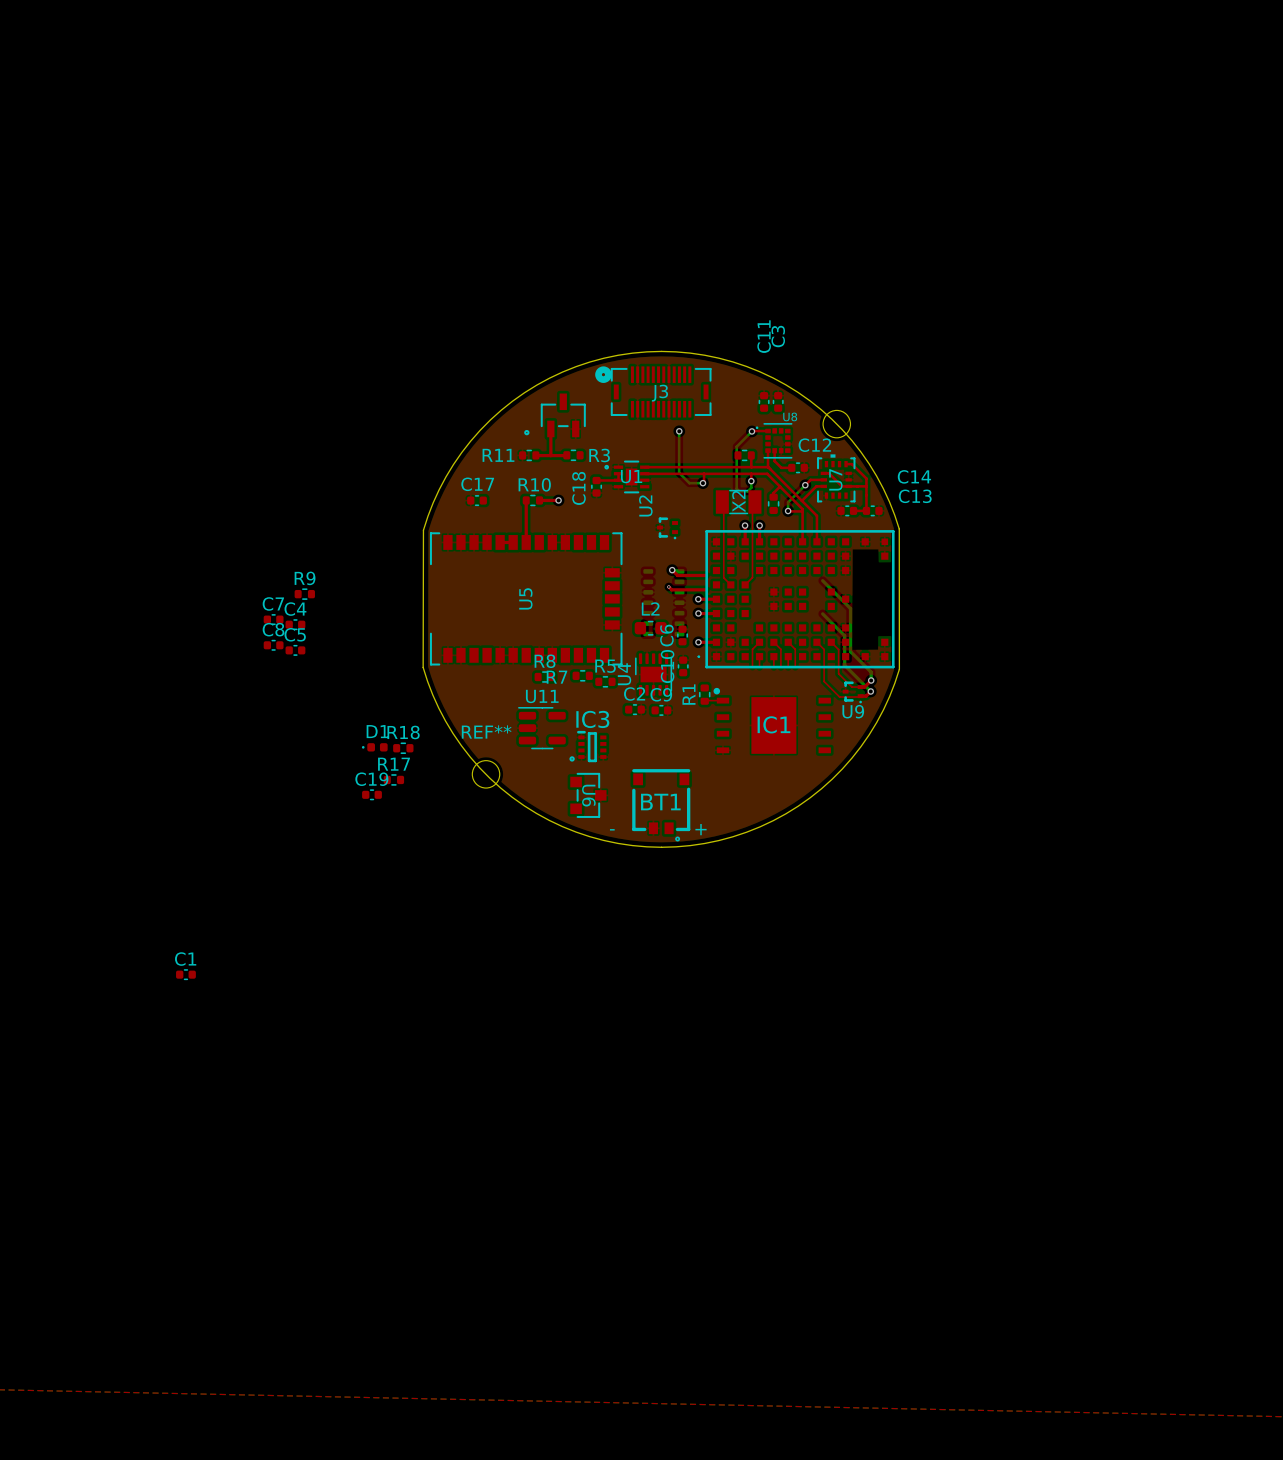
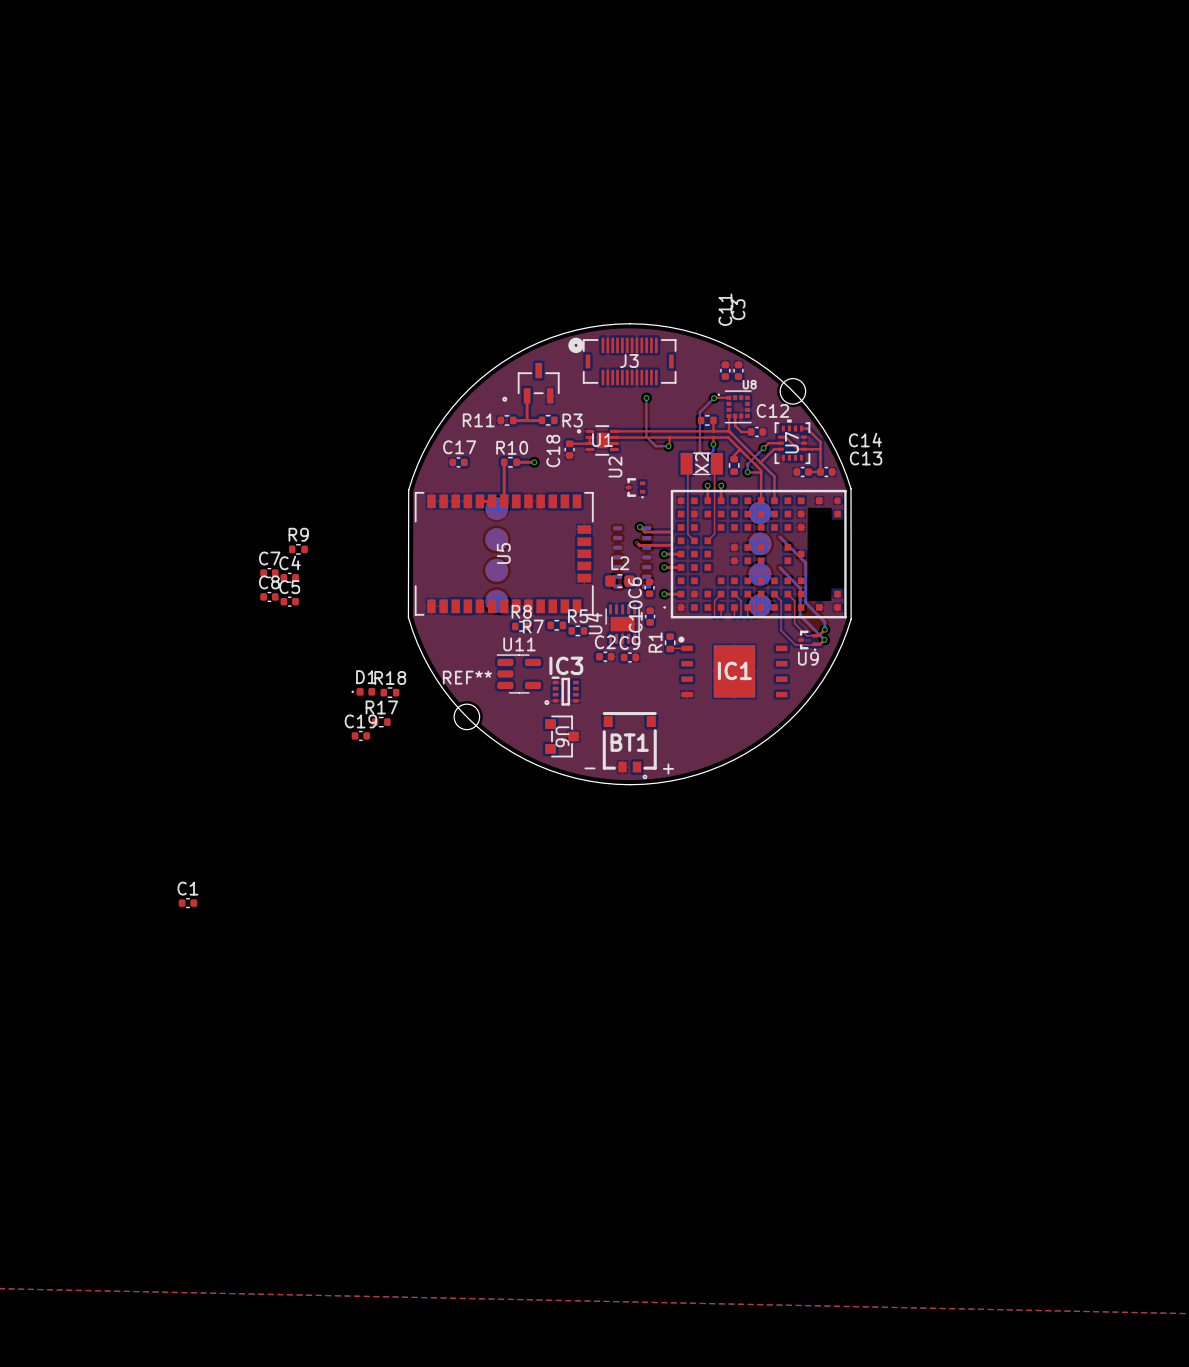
part: none -> (496, 554)
part: none -> (760, 559)

